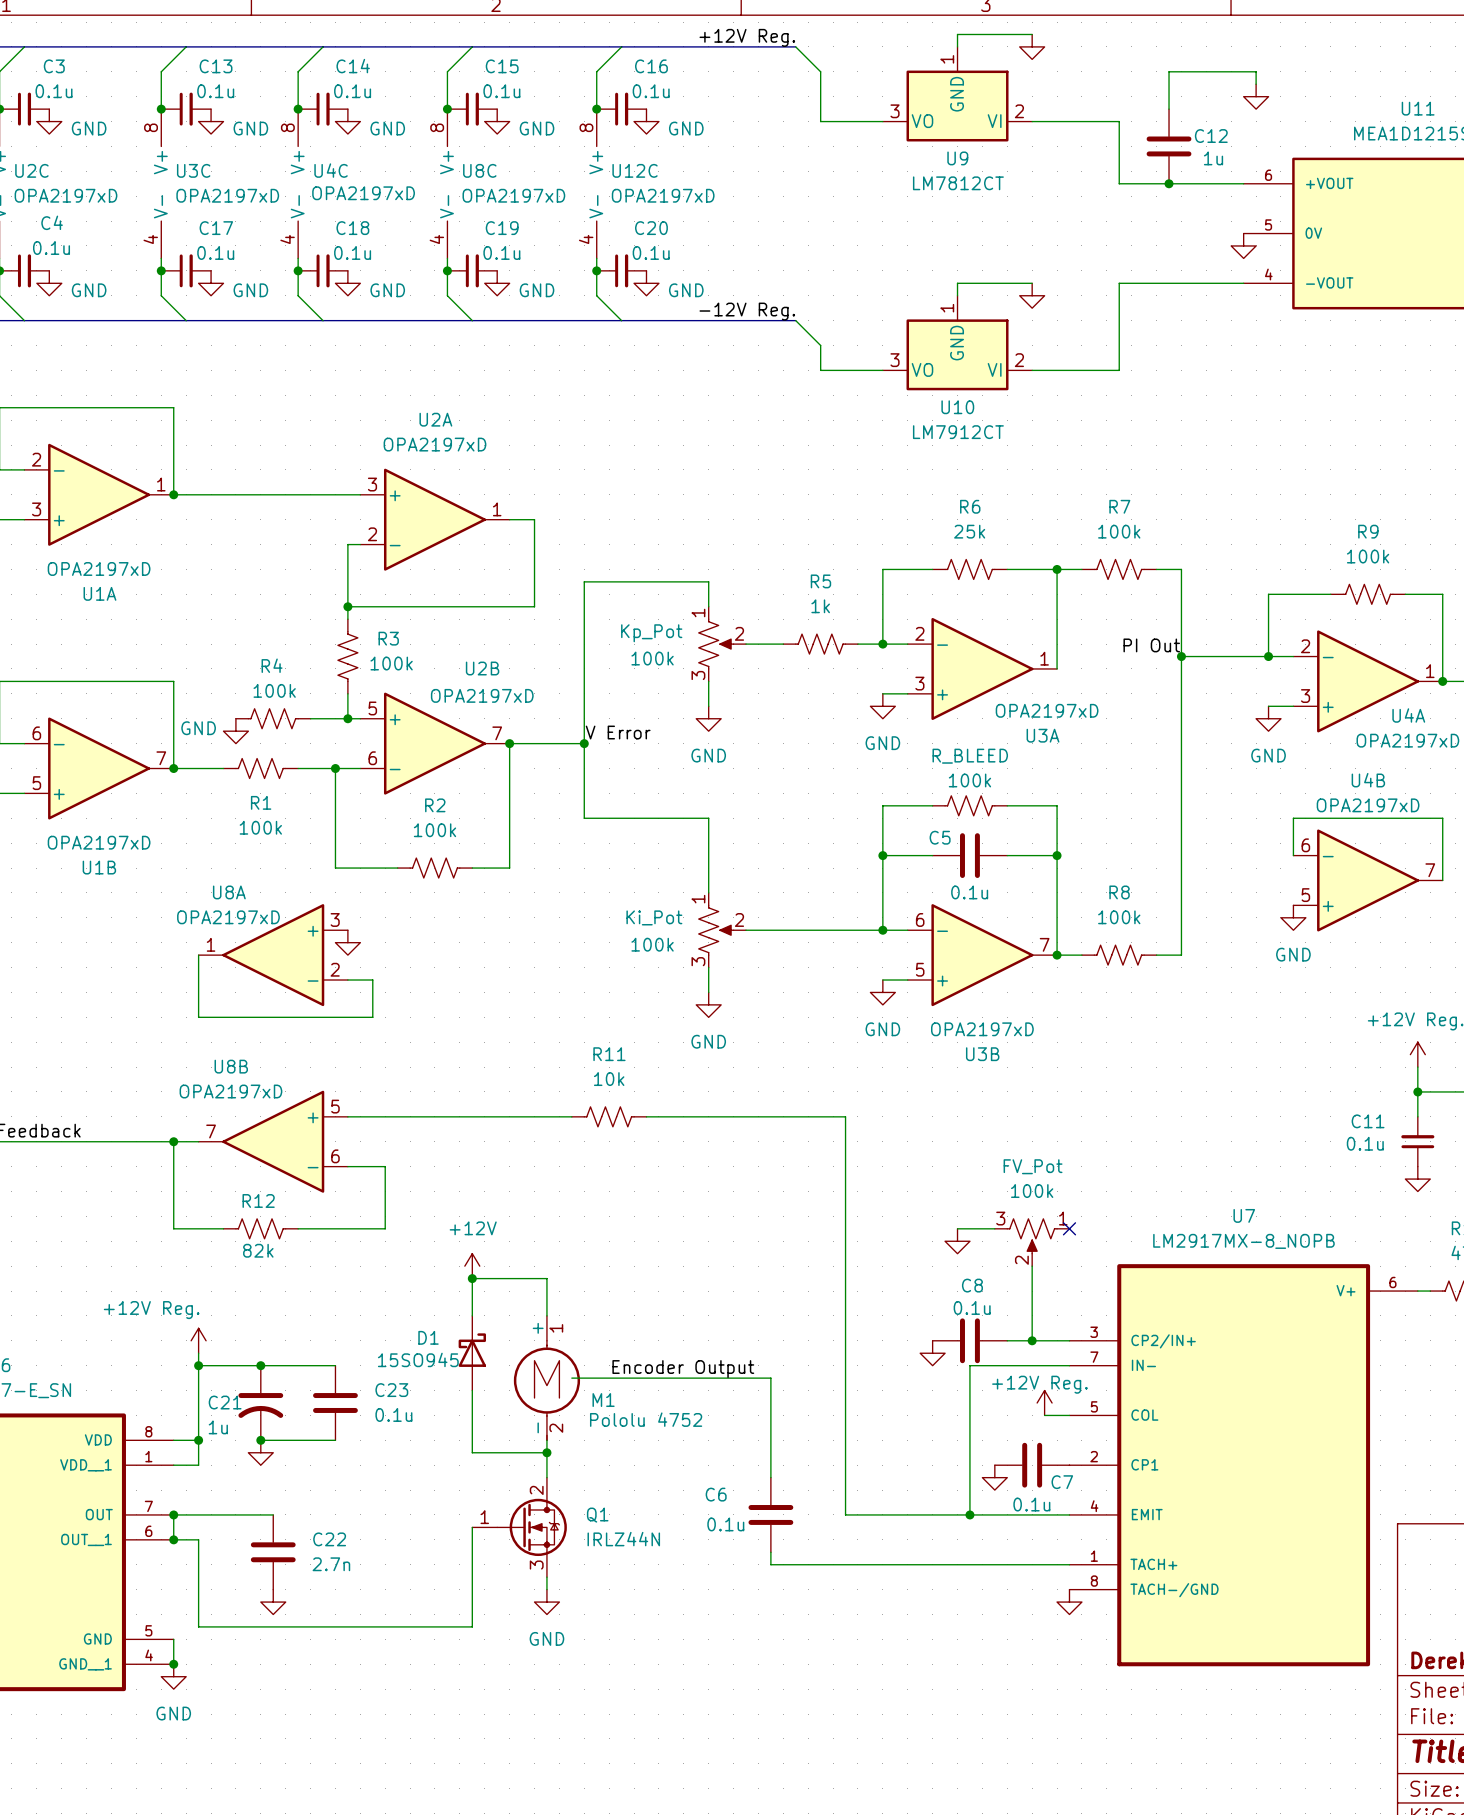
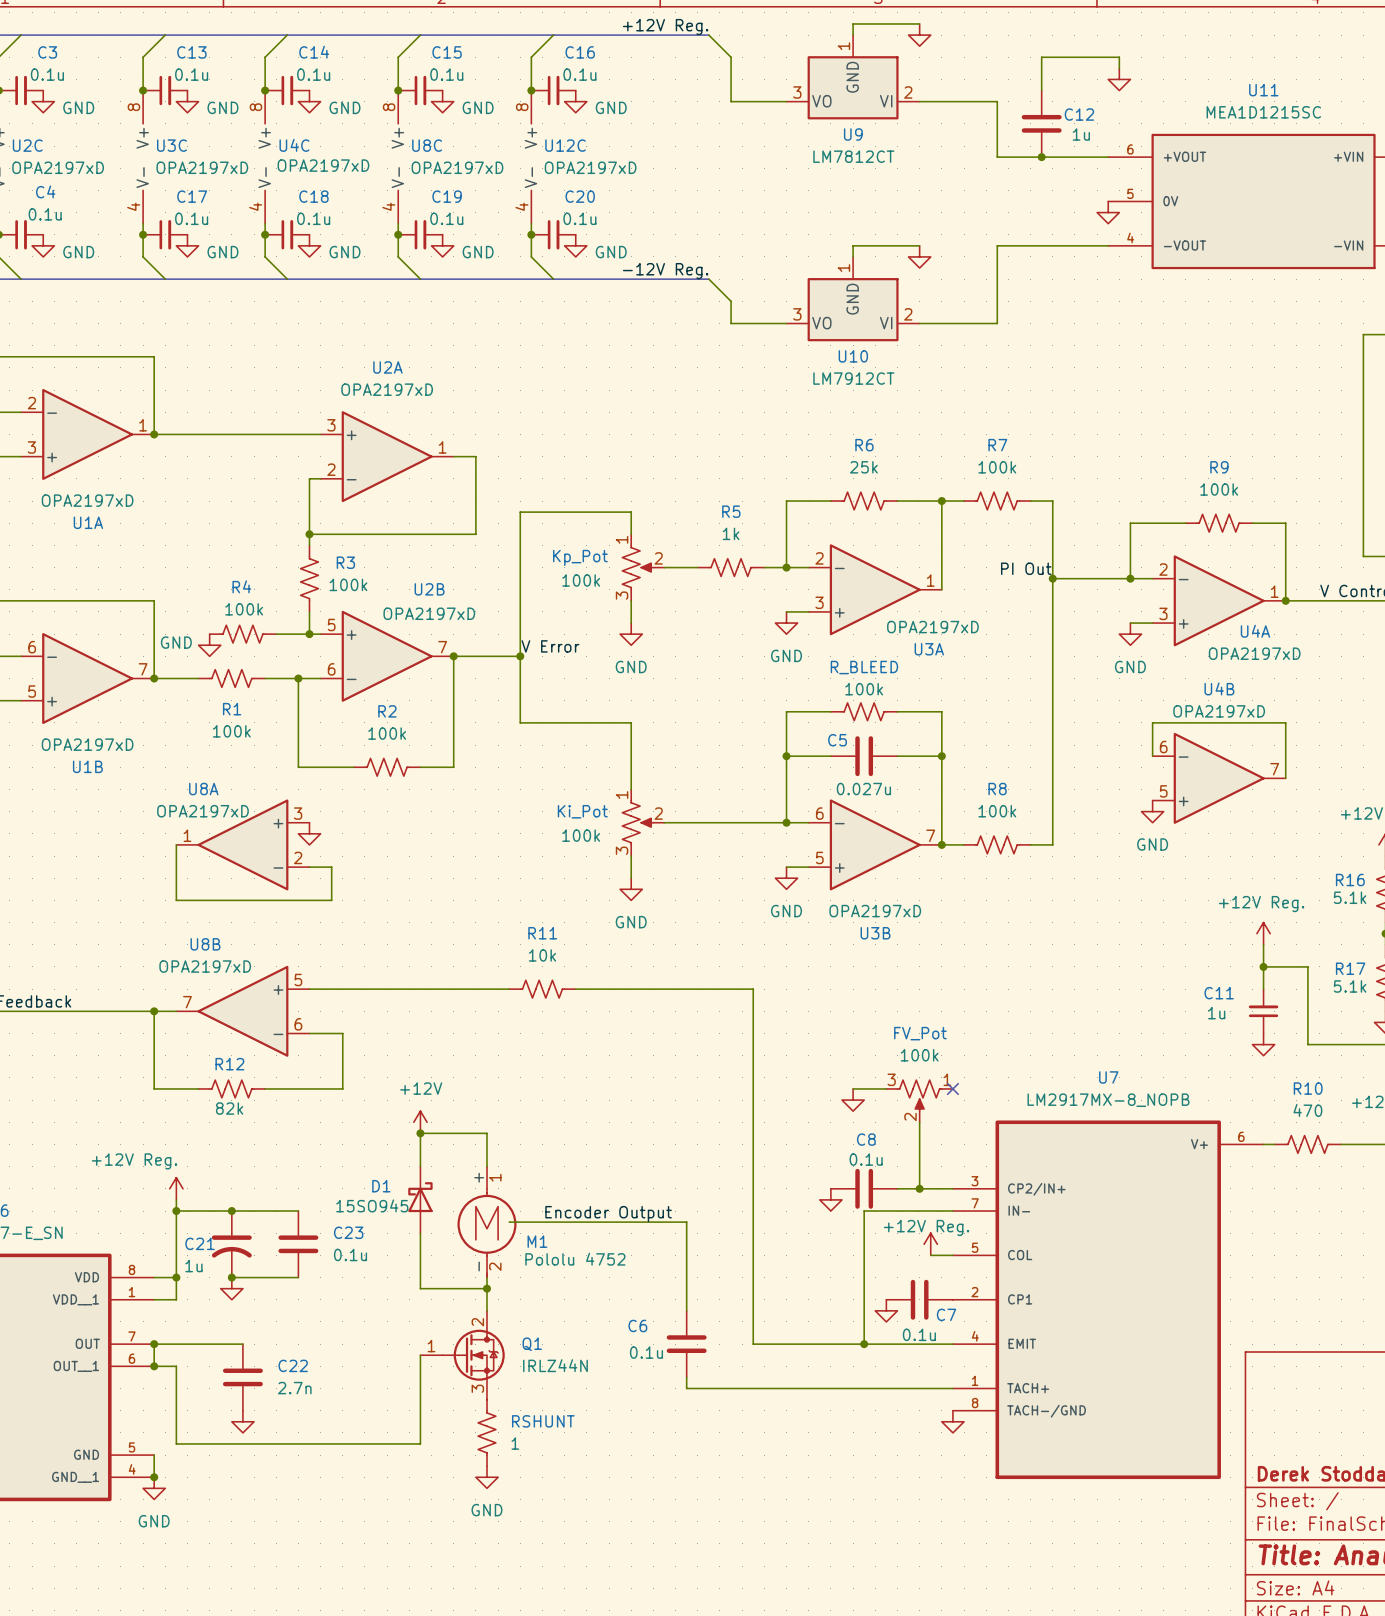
C5 value: 0.1u (969, 892) -> 0.027u (863, 789)
C11 value: 0.1u (1365, 1143) -> 1u (1216, 1013)
power symbol position: GND (546, 1602) -> GND (486, 1477)
RSHUNT: none -> 1 (486, 1432)

